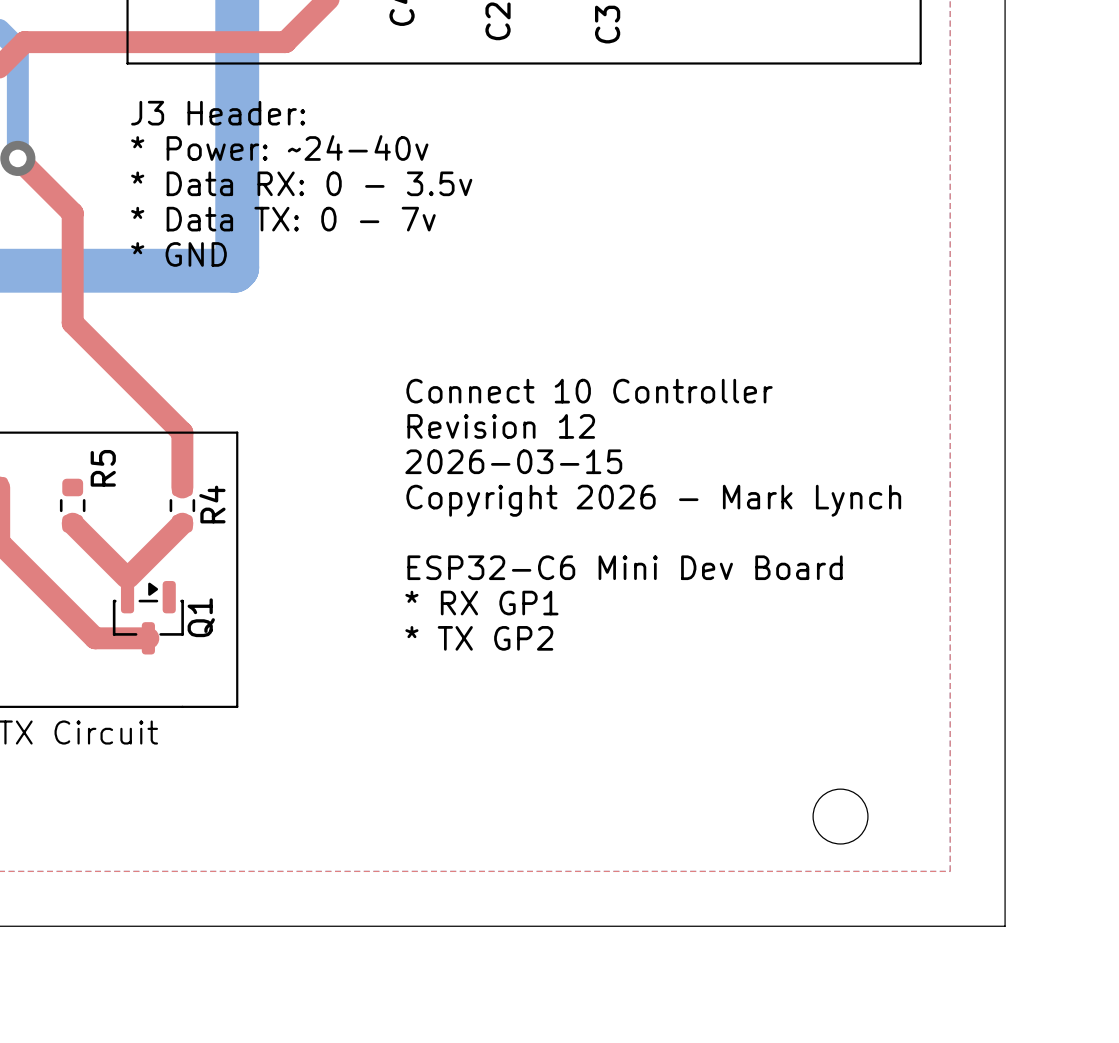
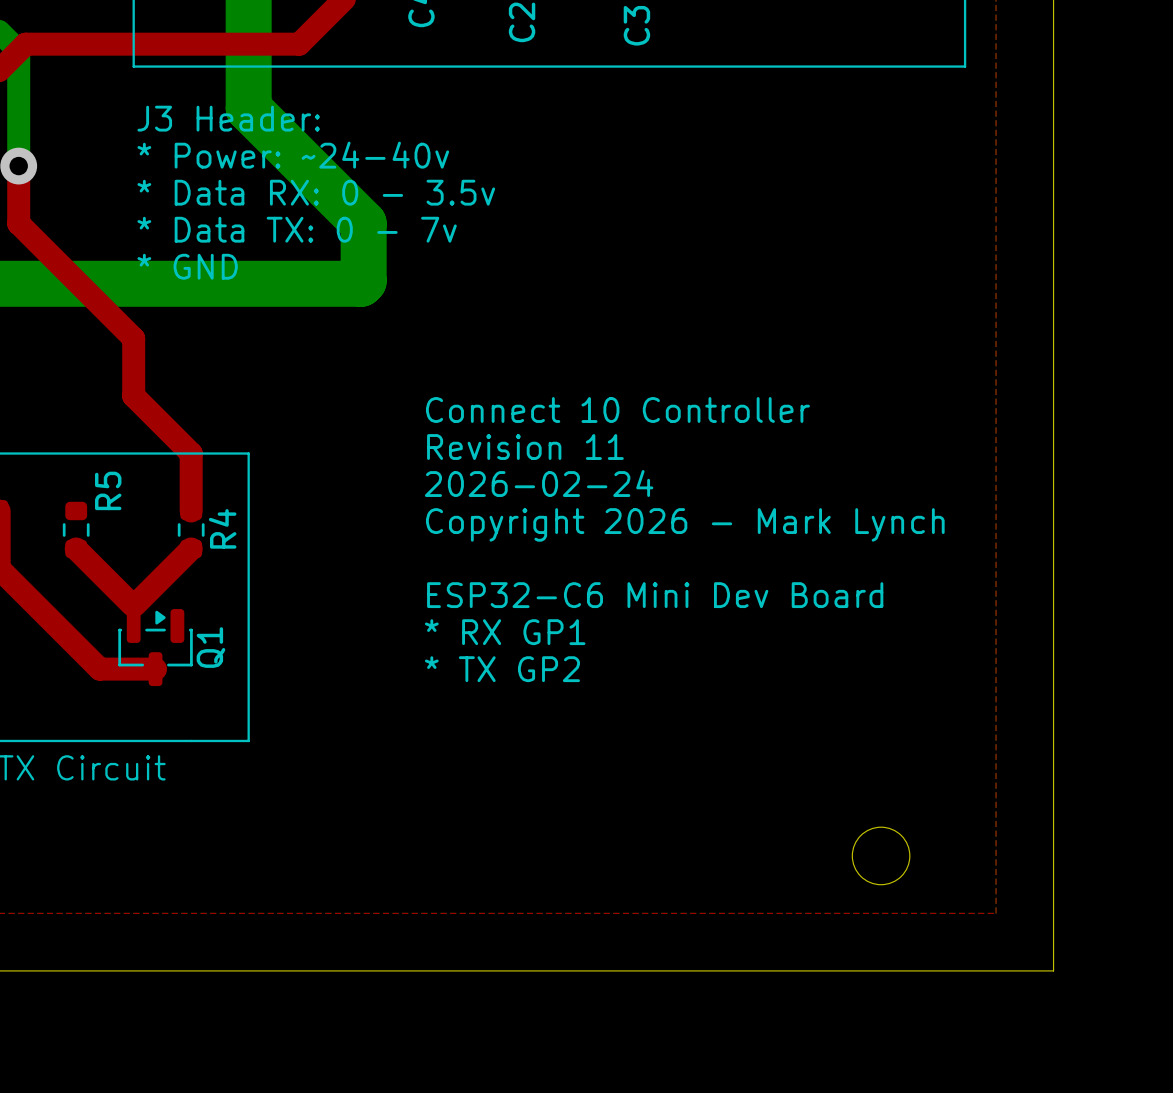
bottom track: (237, 103) (237, 268) (234, 270) -> (248, 108) (363, 223) (363, 281) (360, 283) (245, 283)
top track: (17, 158) (72, 213) (72, 322) (127, 377) -> (18, 166) (18, 223) (133, 338) (133, 396)
text: Revision 12 (501, 426) -> Revision 11 (525, 447)
text: 2026-03-15 (513, 461) -> 2026-02-24 (539, 483)

